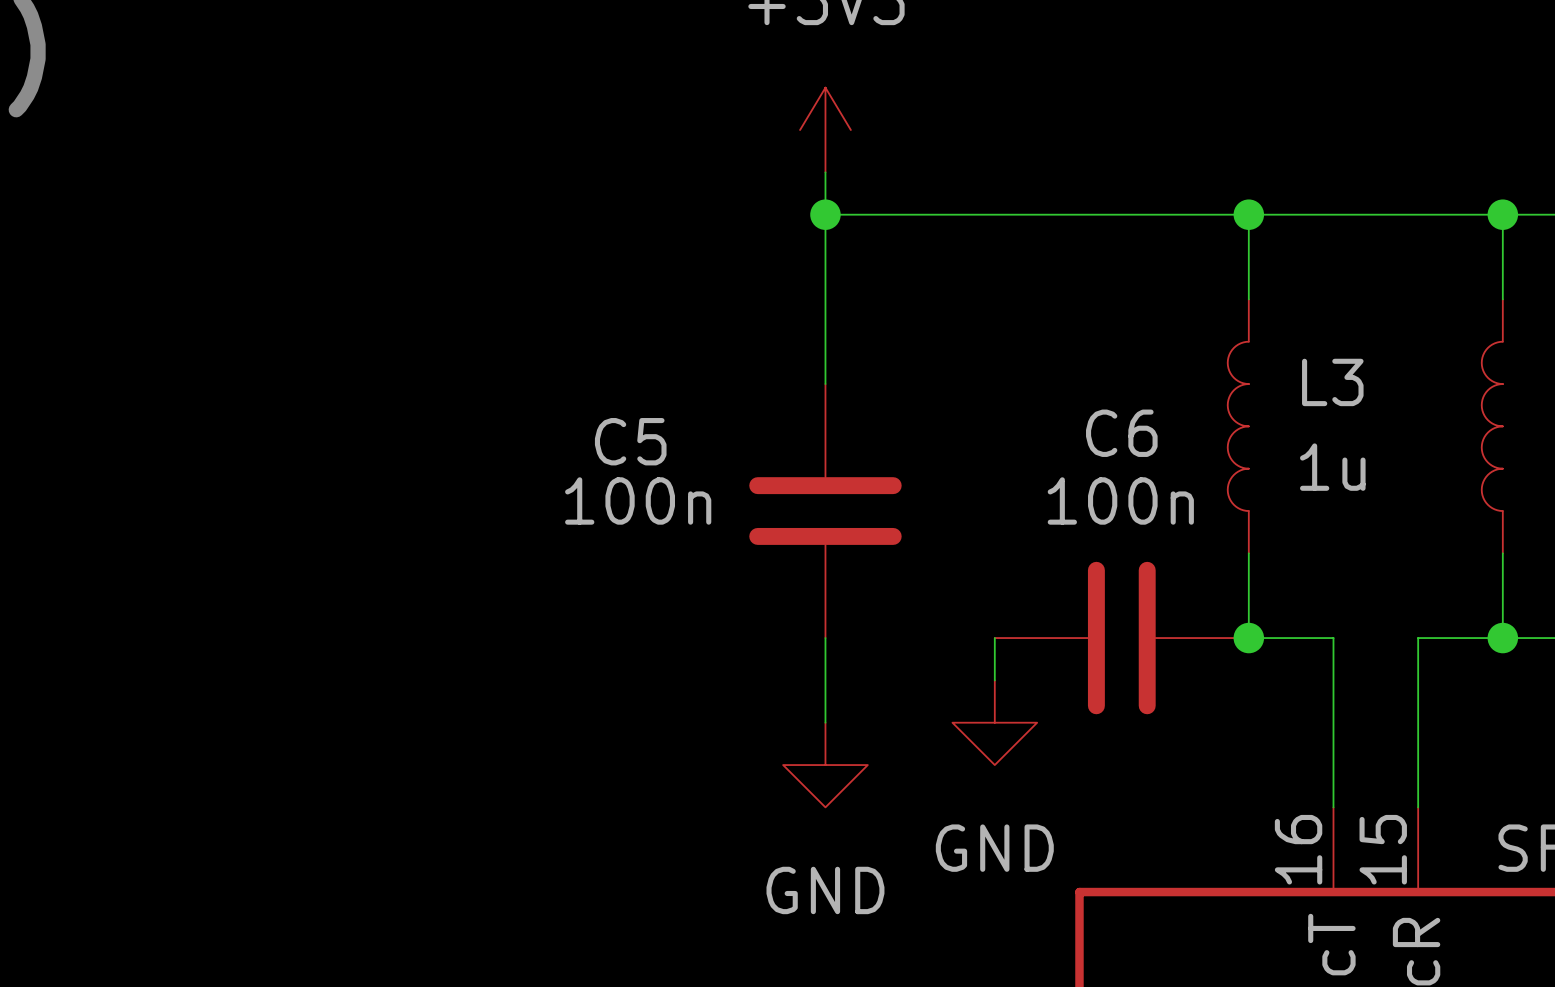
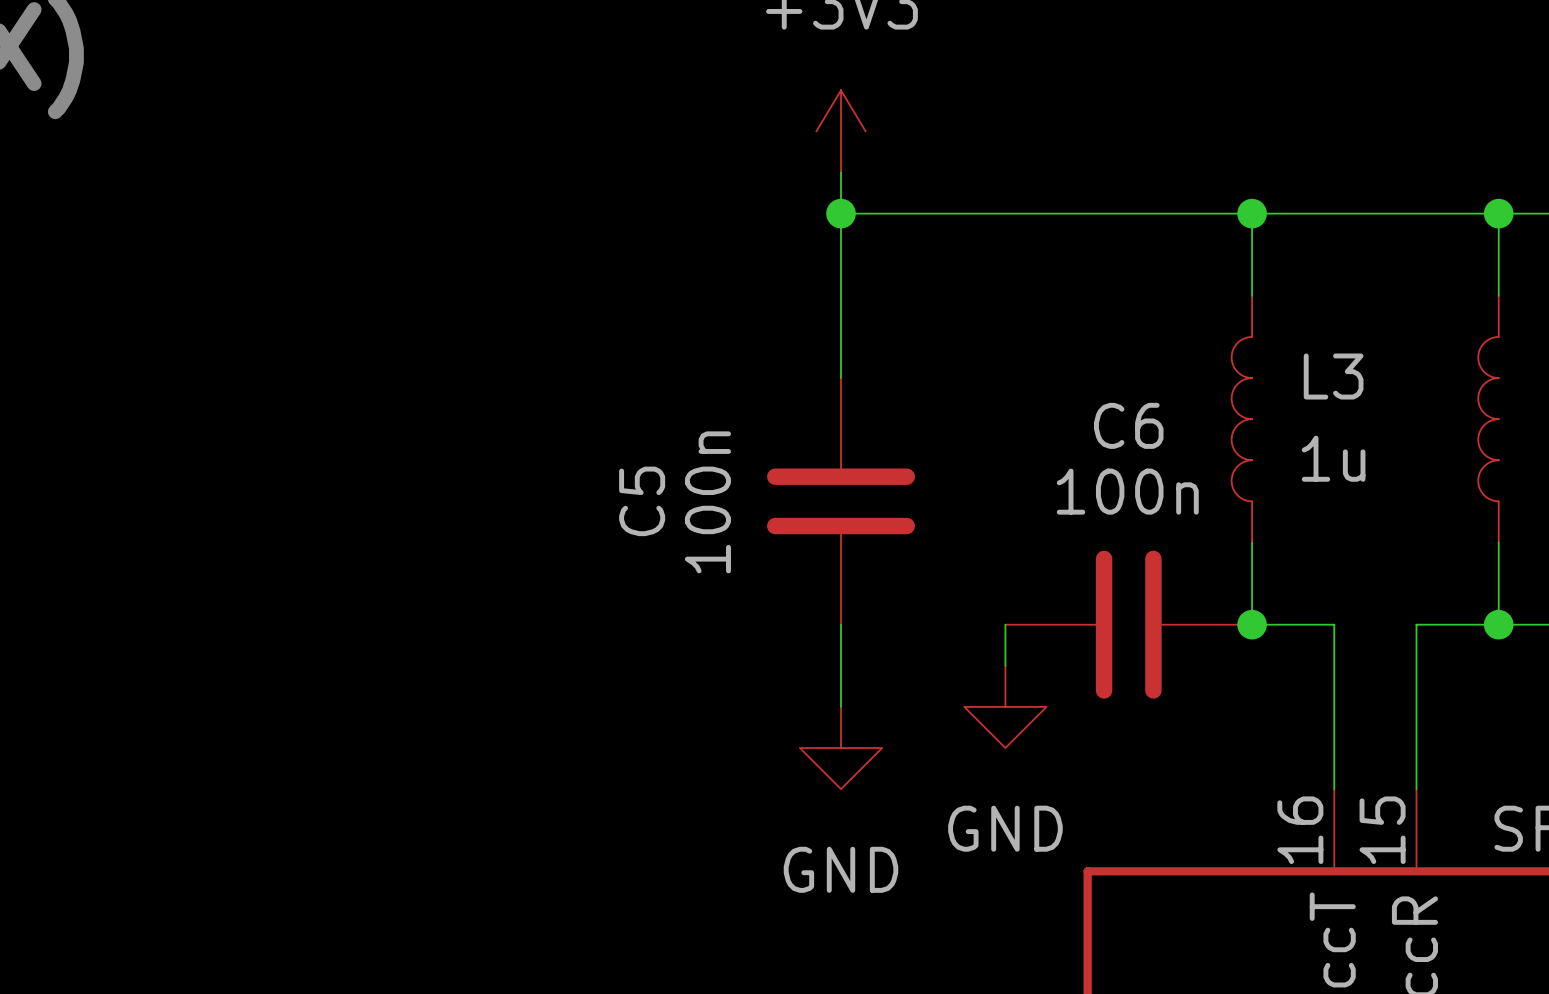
C5 name rotation: 0° (630, 441) -> 90° counterclockwise (642, 501)
C5 value rotation: 0° (638, 500) -> 90° counterclockwise (707, 502)

